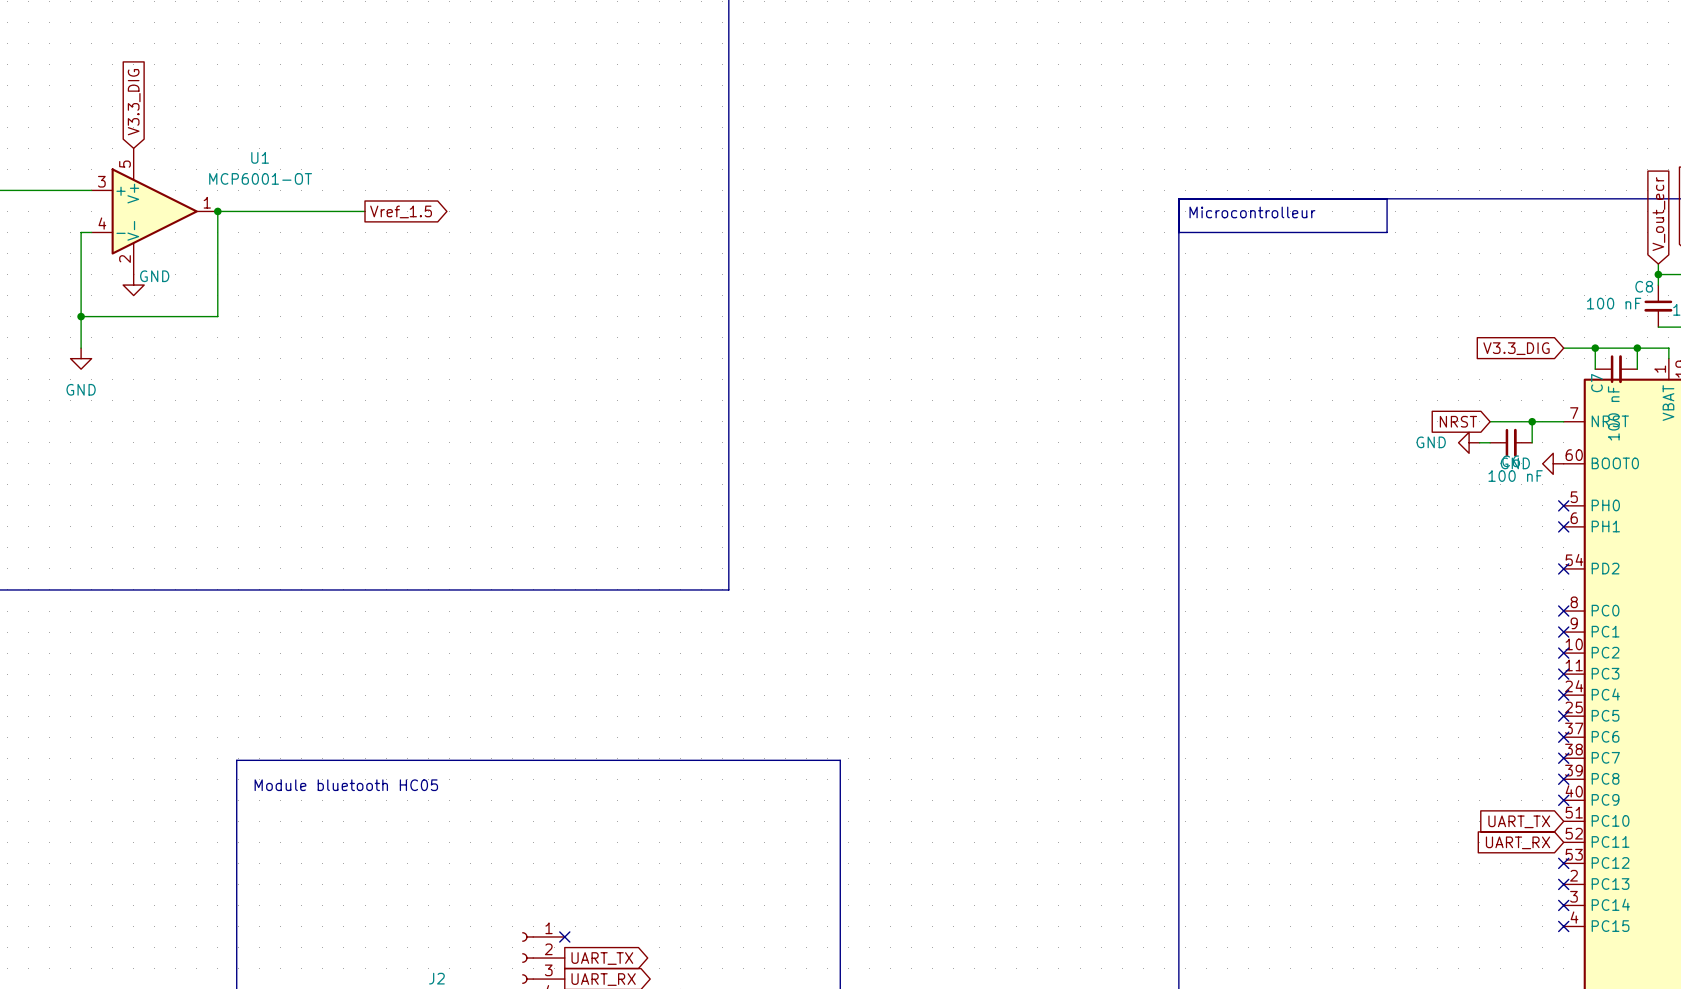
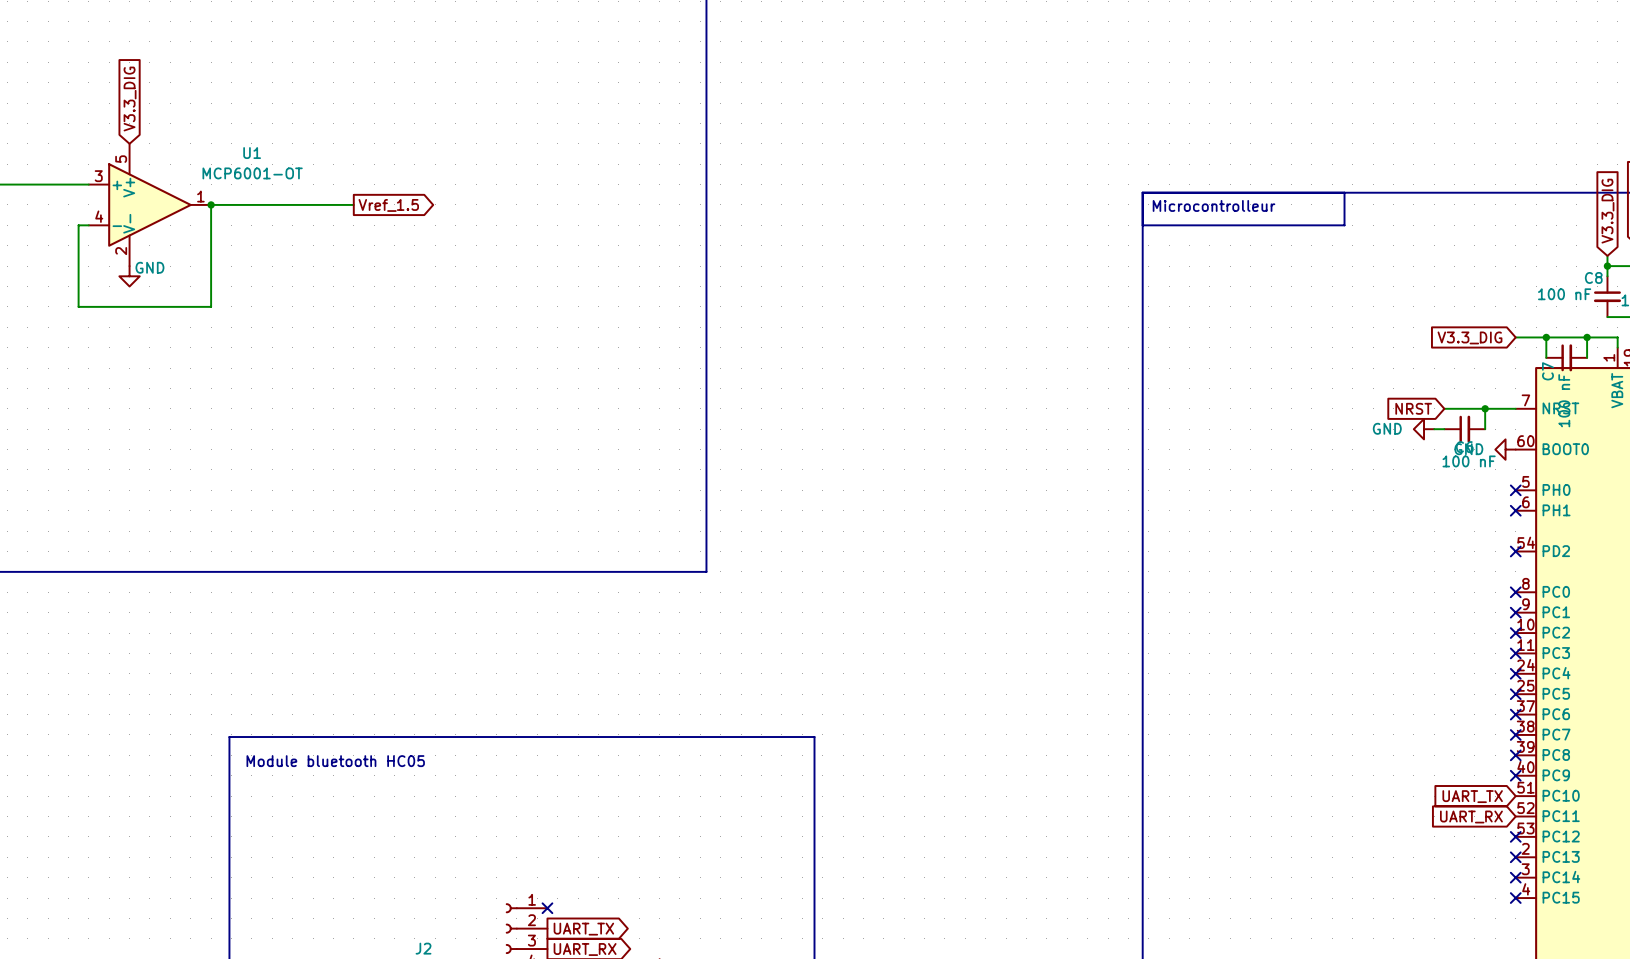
global label: V_out_ecr (1658, 214) -> V3.3_DIG (1607, 211)
wire: (81, 316) (81, 348) -> none
junction: (81, 316) -> none
power symbol: GND (81, 358) -> none

